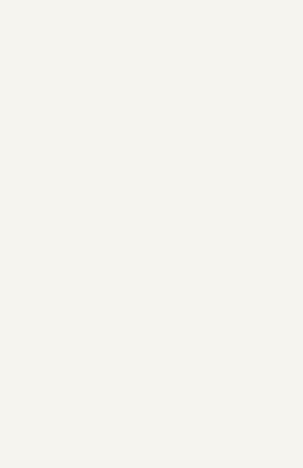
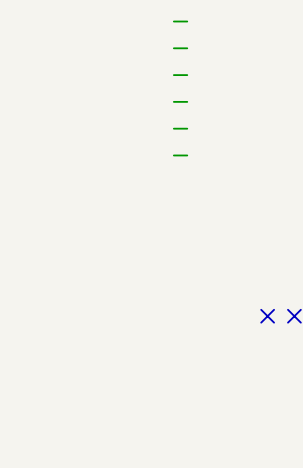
wire: none -> (173, 21) (187, 21)
wire: none -> (173, 48) (187, 48)
wire: none -> (173, 75) (187, 75)
wire: none -> (173, 101) (187, 101)
wire: none -> (173, 128) (187, 128)
wire: none -> (173, 155) (187, 155)
no-connect mark: none -> (267, 316)
no-connect mark: none -> (294, 316)

